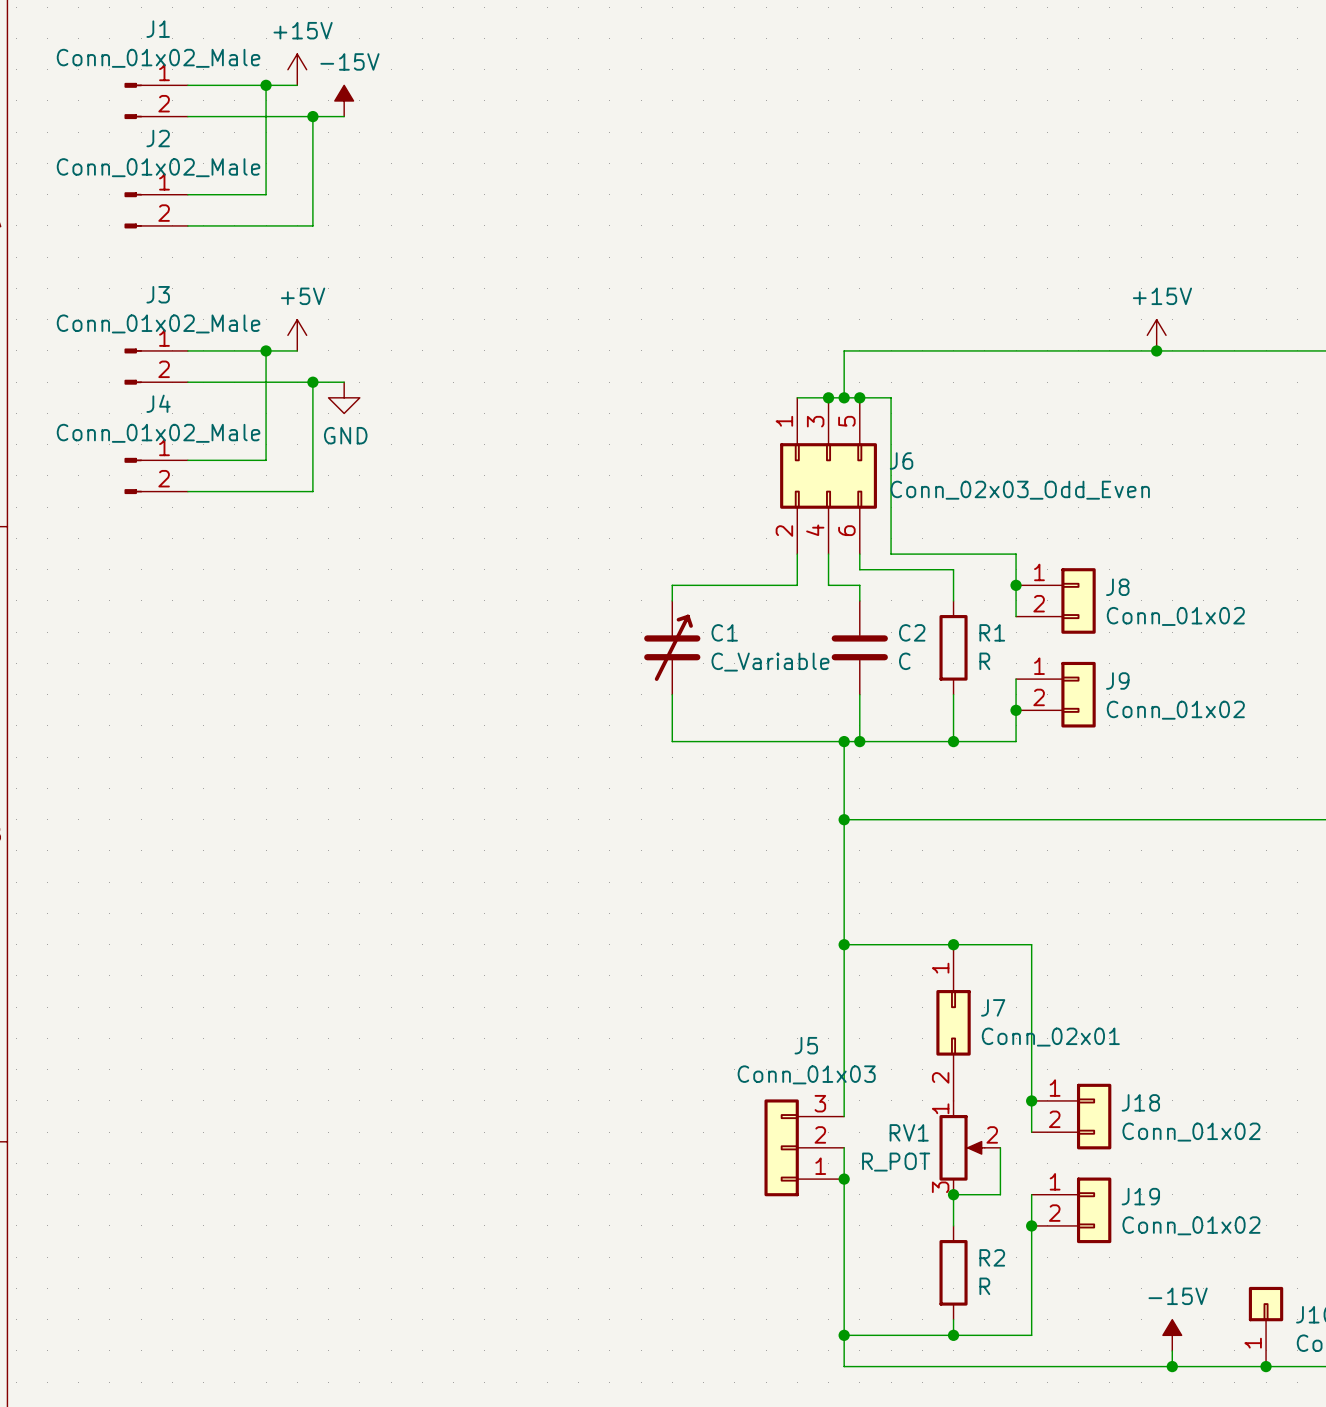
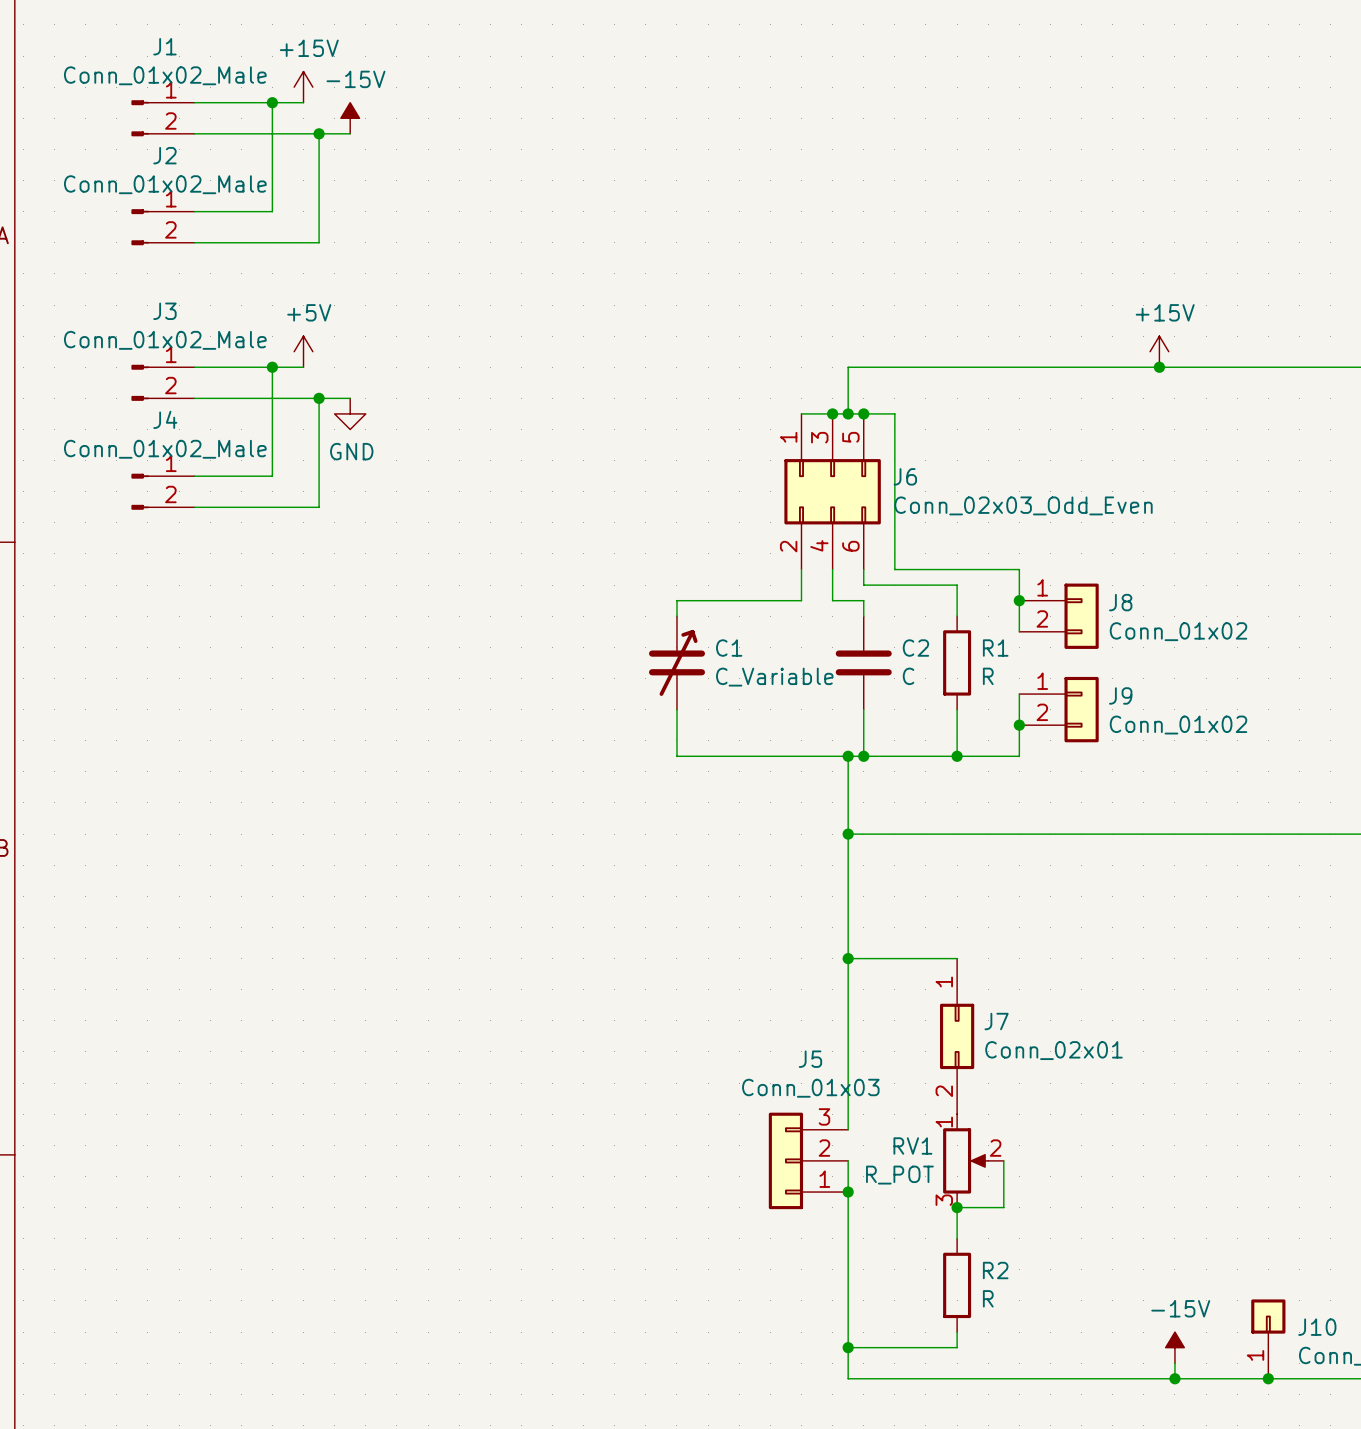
wire: (953, 944) (1031, 944) (1031, 1132) -> none
junction: (953, 944) -> none
junction: (1031, 1100) -> none
J18: Conn_01x02 (1071, 1116) -> none
wire: (1031, 1194) (1031, 1335) (953, 1335) -> none
J19: Conn_01x02 (1071, 1210) -> none
junction: (1031, 1225) -> none
junction: (953, 1335) -> none

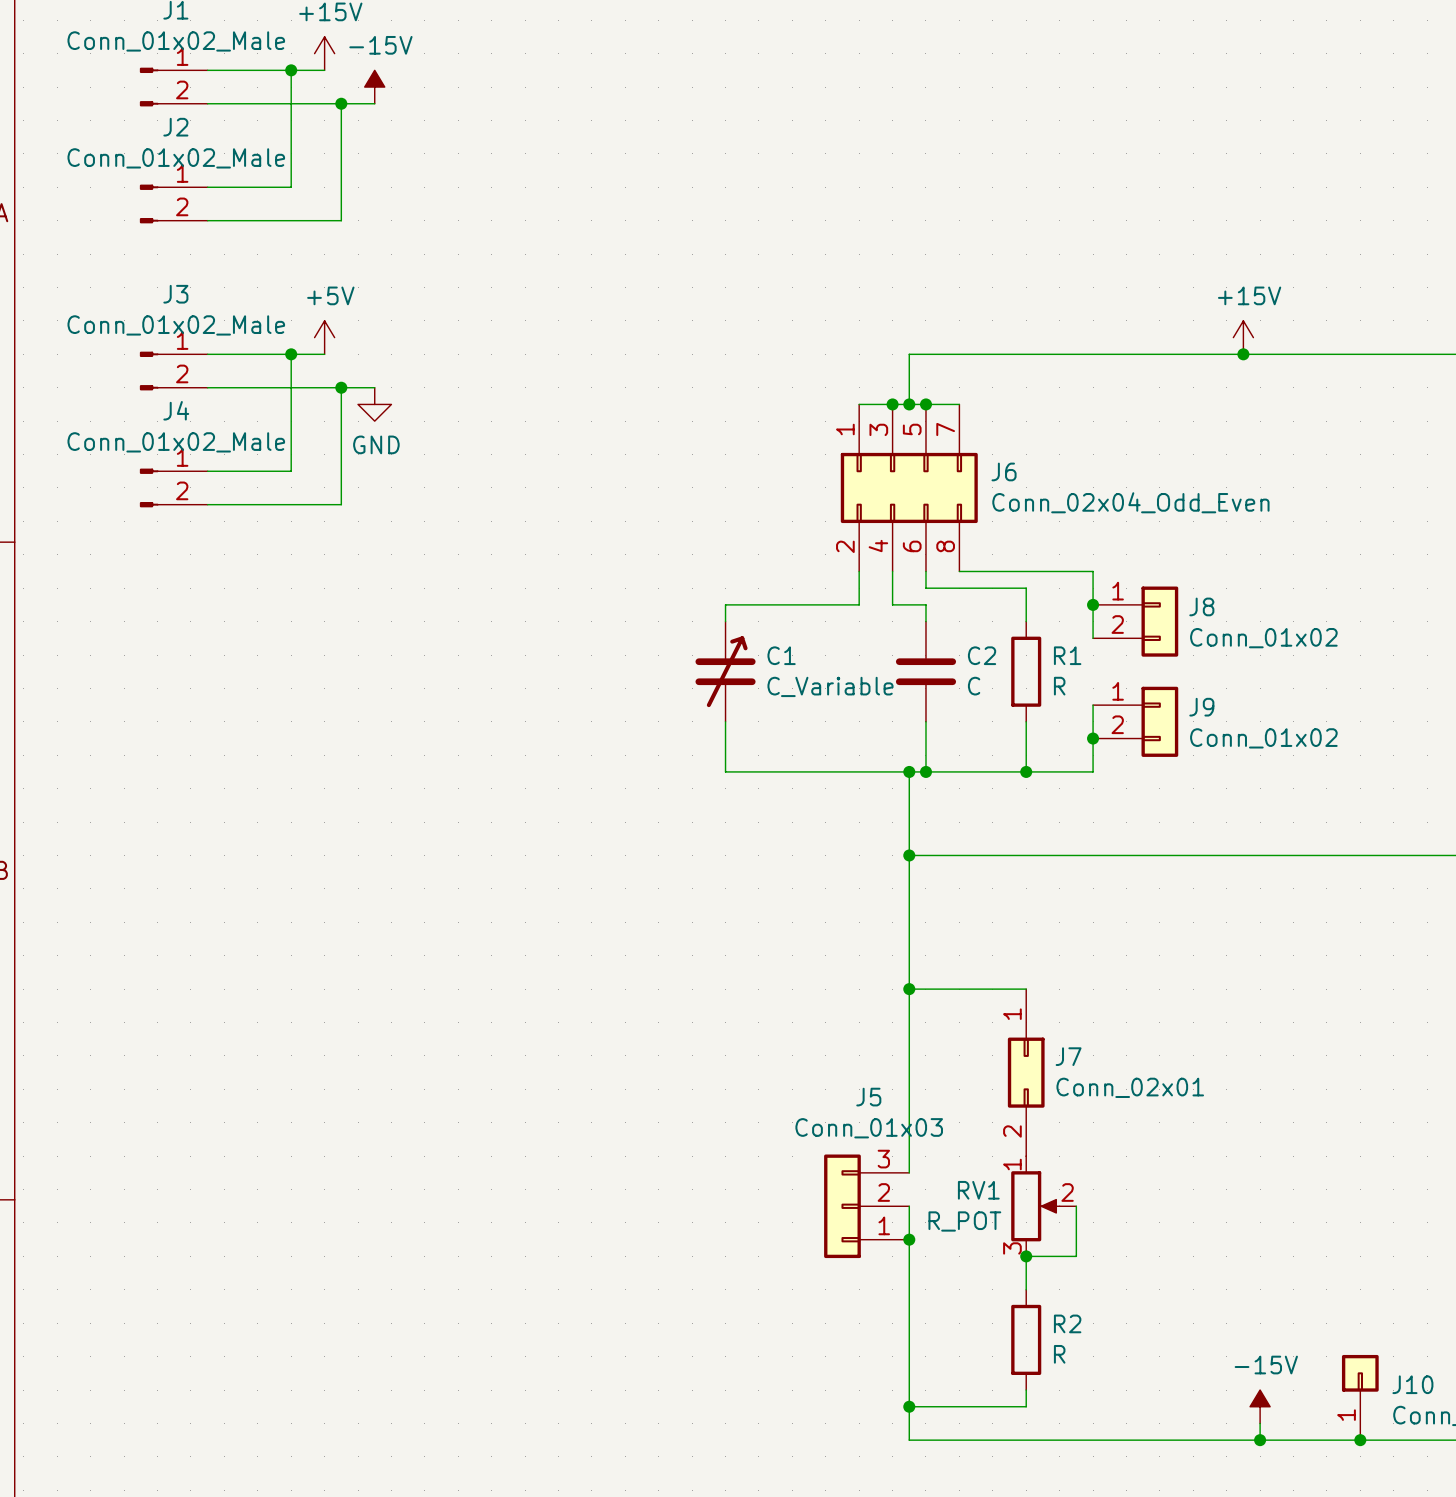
J6 symbol: [784, 413, 881, 570] -> [840, 404, 978, 572]
J6 value: Conn_02x03_Odd_Even (1023, 505) -> Conn_02x04_Odd_Even (1130, 502)

